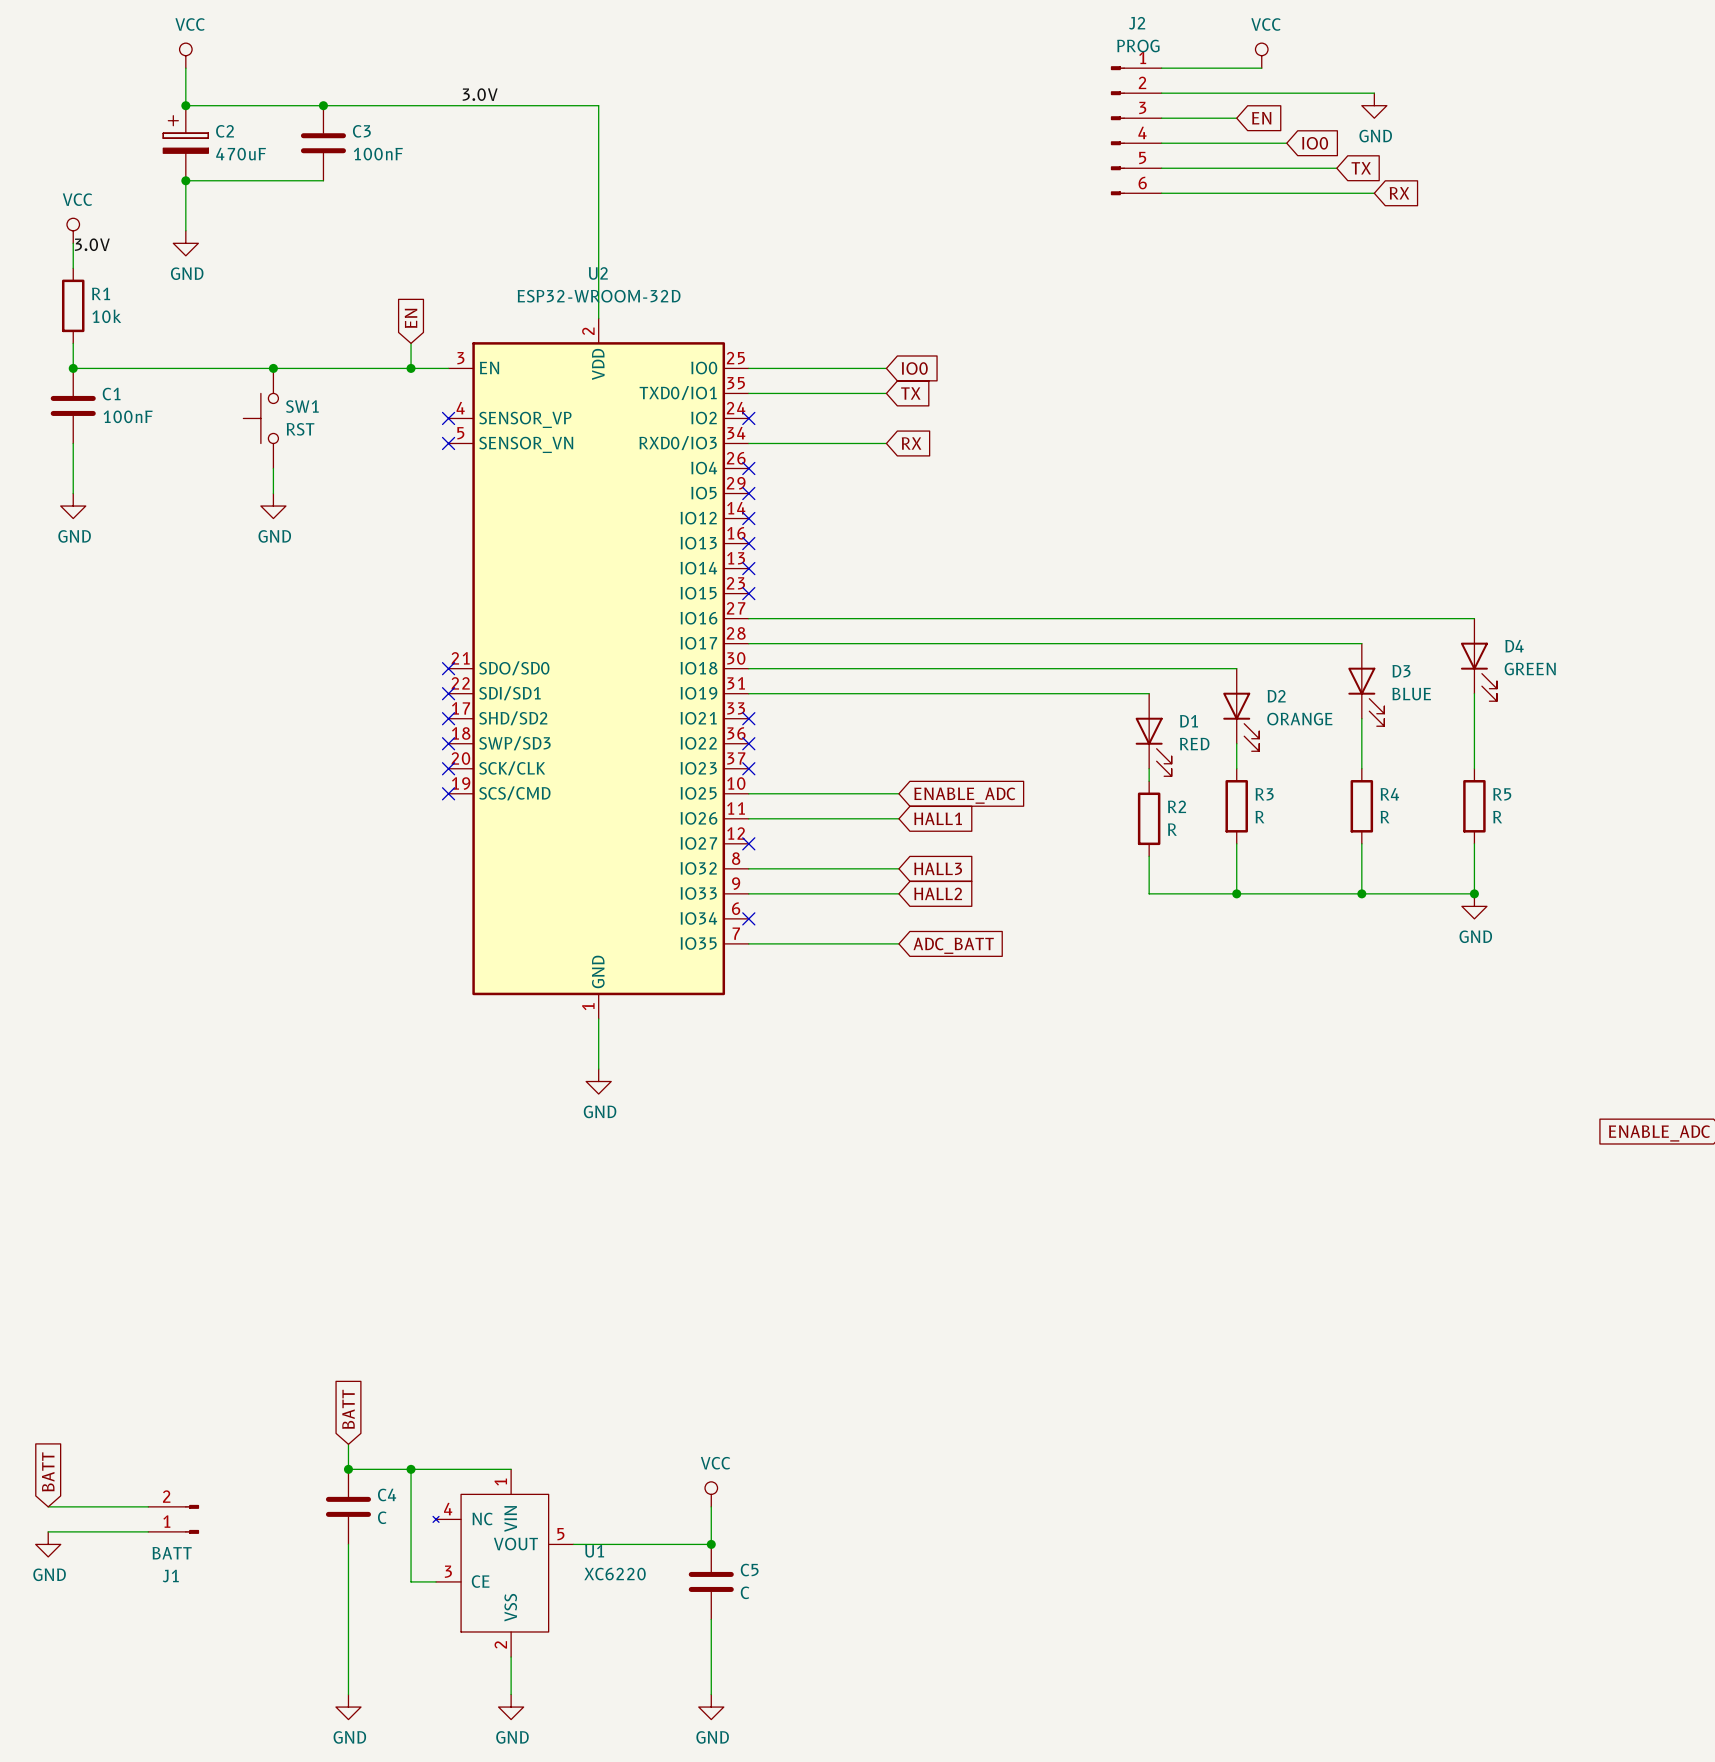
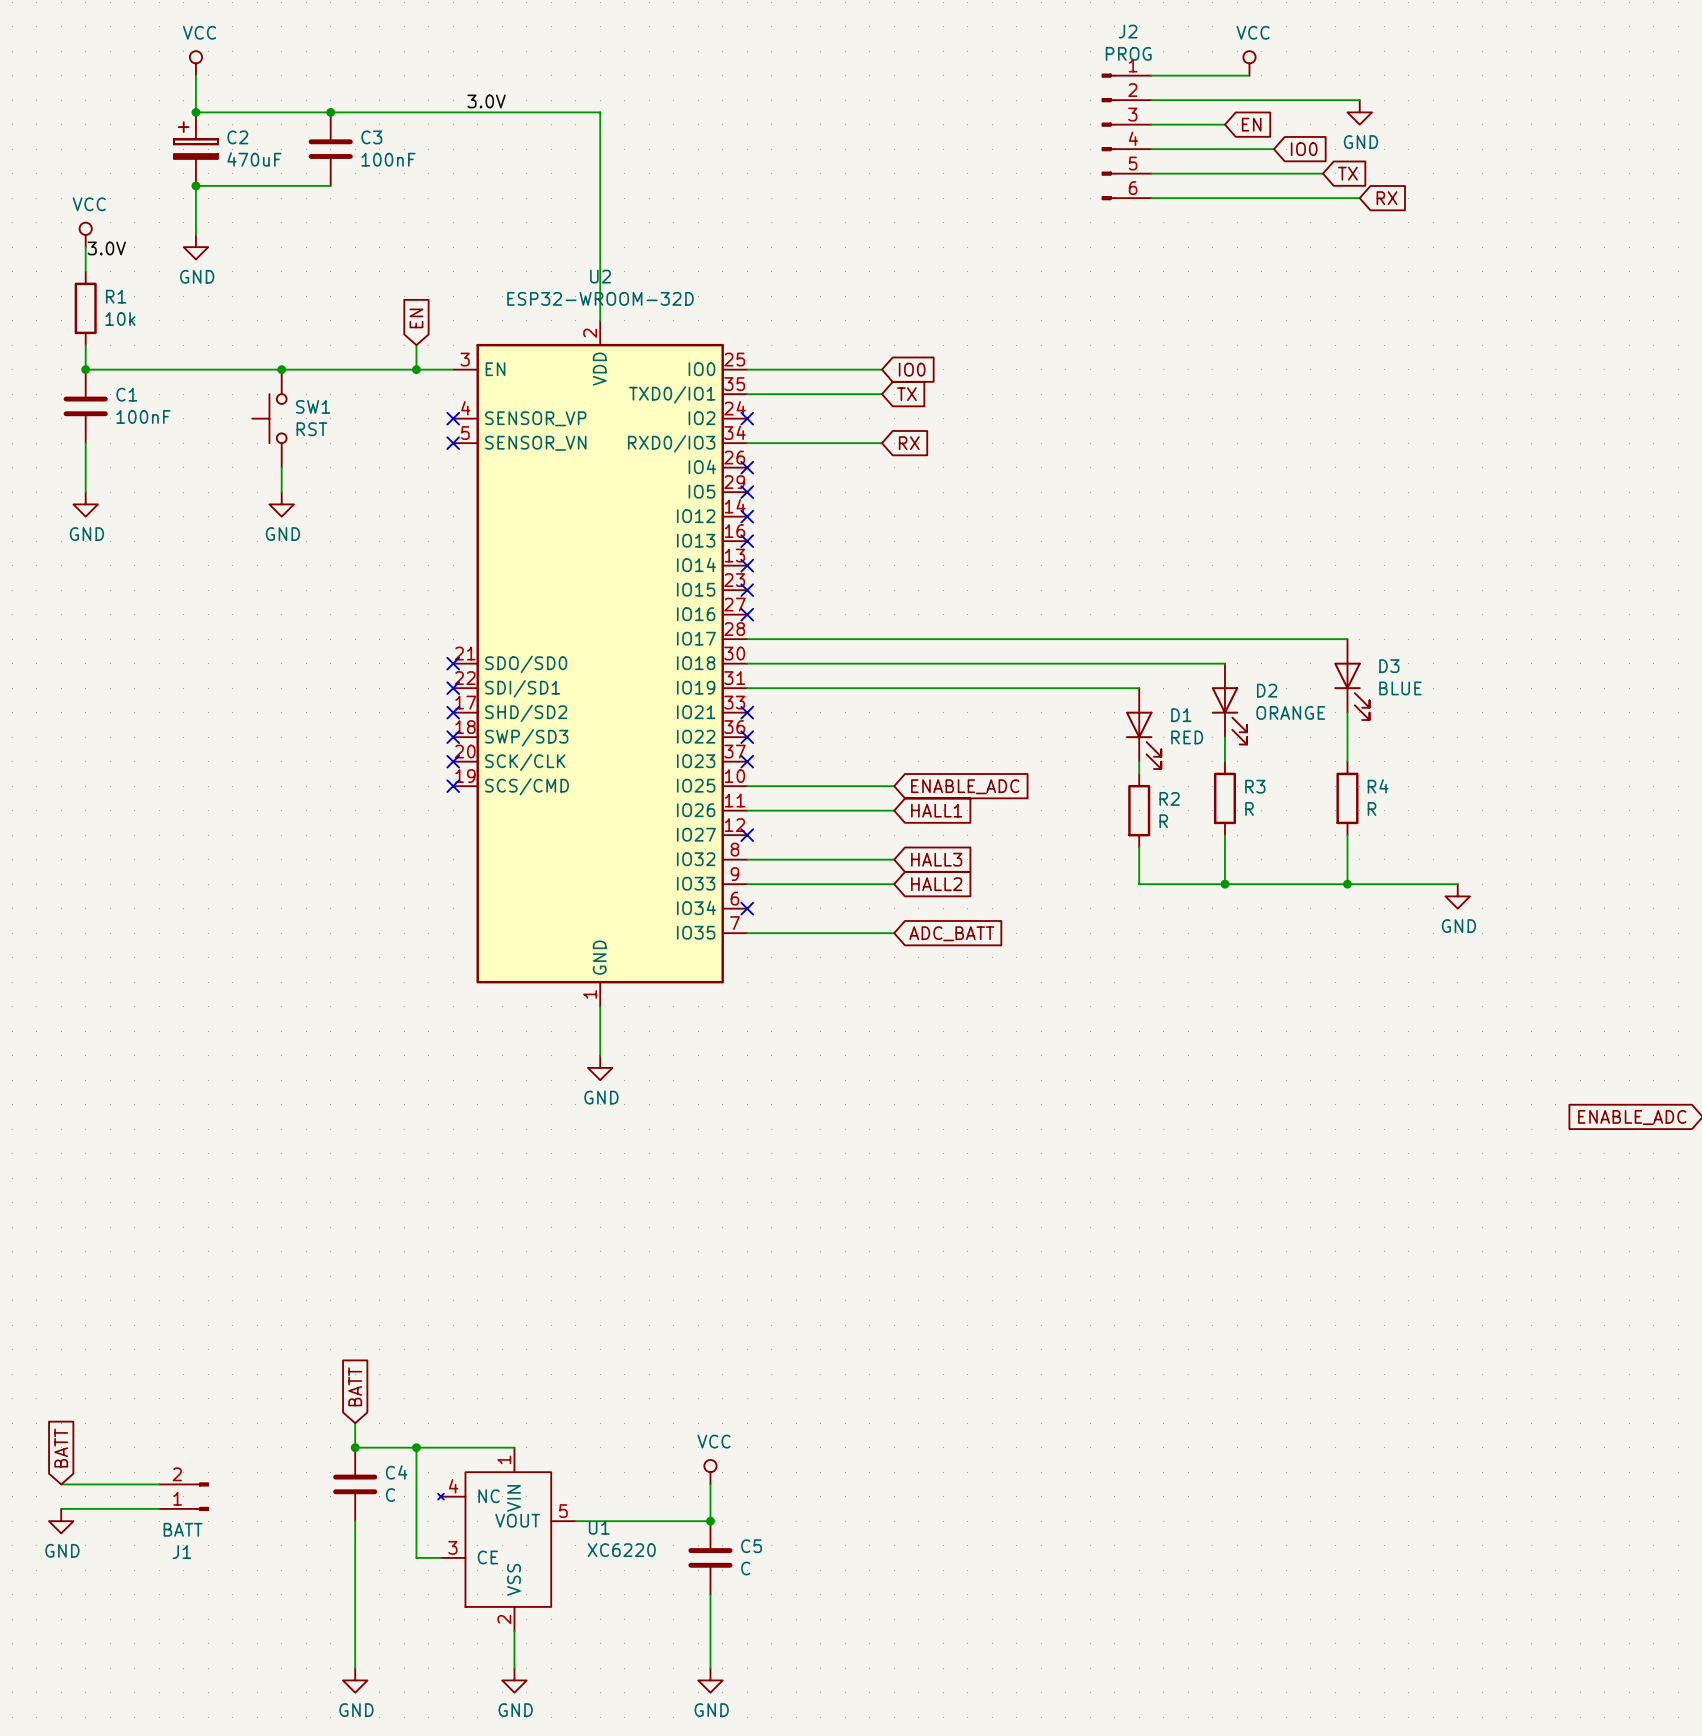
wire: (748, 618) (1474, 618) -> none
no-connect mark: none -> (747, 614)
D4: GREEN (1478, 659) -> none
wire: (1474, 693) (1474, 768) -> none
R5: R (1474, 806) -> none
wire: (1474, 843) (1474, 893) -> none
junction: (1474, 893) -> none

